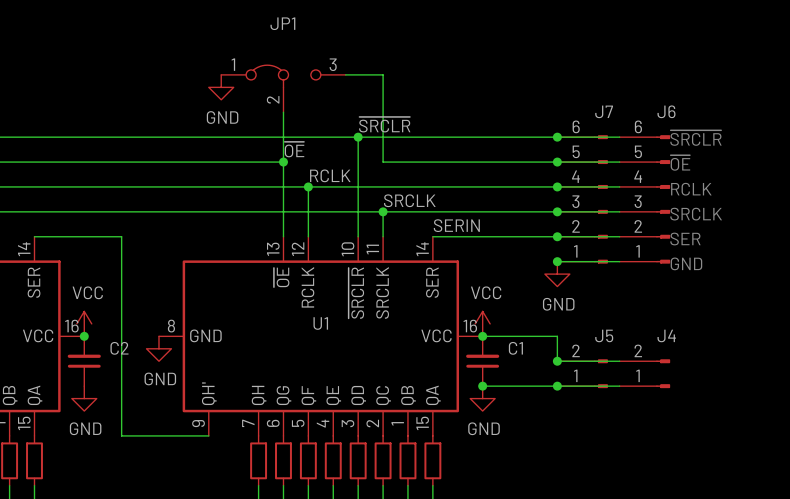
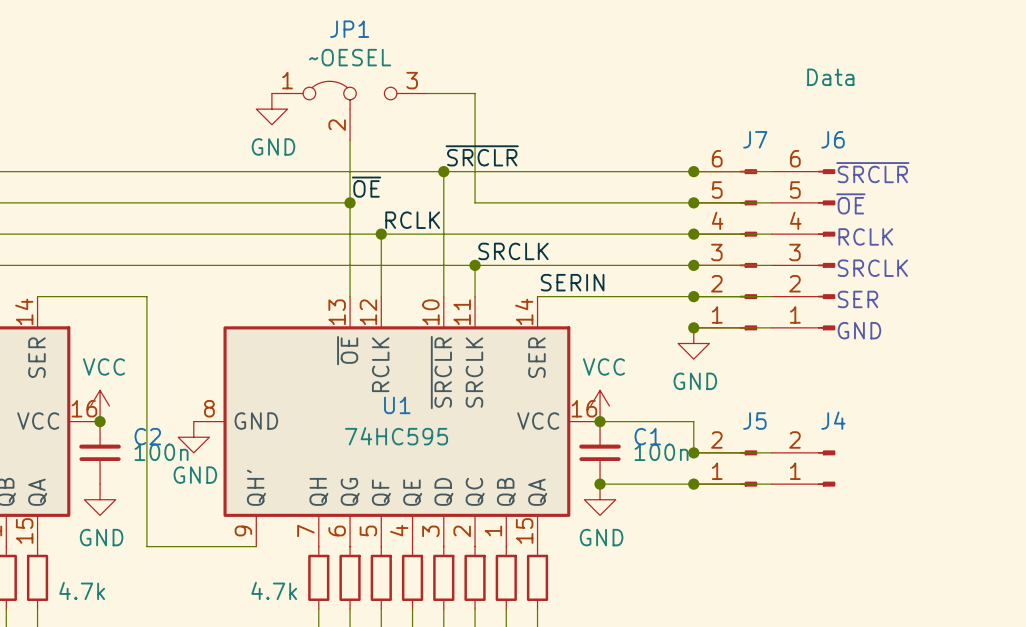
JP1 value: none -> ~OESEL (350, 57)
J6 value: none -> Data (830, 77)
U1 value: none -> 74HC595 (396, 436)
C2 value: none -> 100n (161, 452)
C1 value: none -> 100n (661, 452)
part value: none -> 4.7k (82, 590)
part value: none -> 4.7k (274, 590)

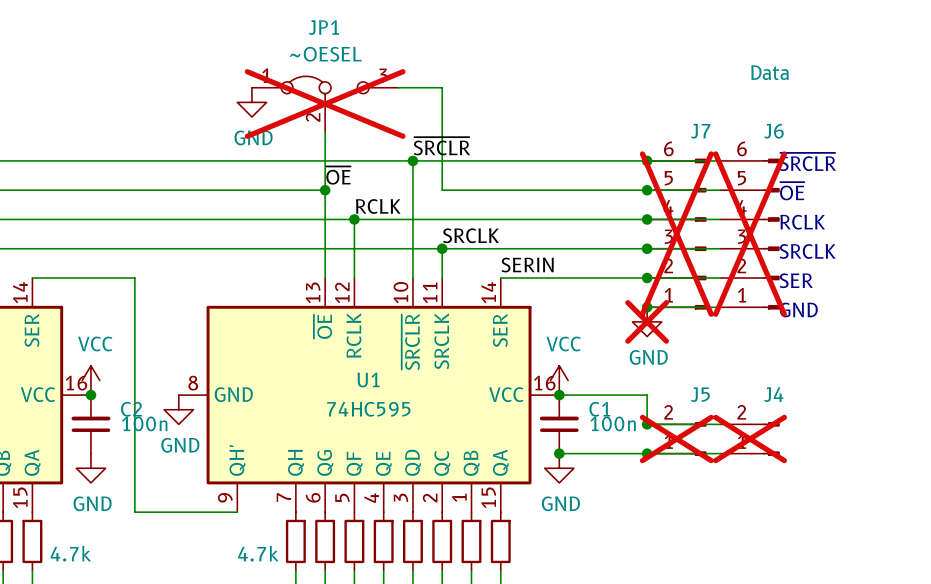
JP1 do-not-place cross: none -> (325, 103)
J7 do-not-place cross: none -> (676, 234)
J6 do-not-place cross: none -> (750, 234)
power symbol do-not-place cross: none -> (647, 321)
J5 do-not-place cross: none -> (676, 439)
J4 do-not-place cross: none -> (750, 439)

